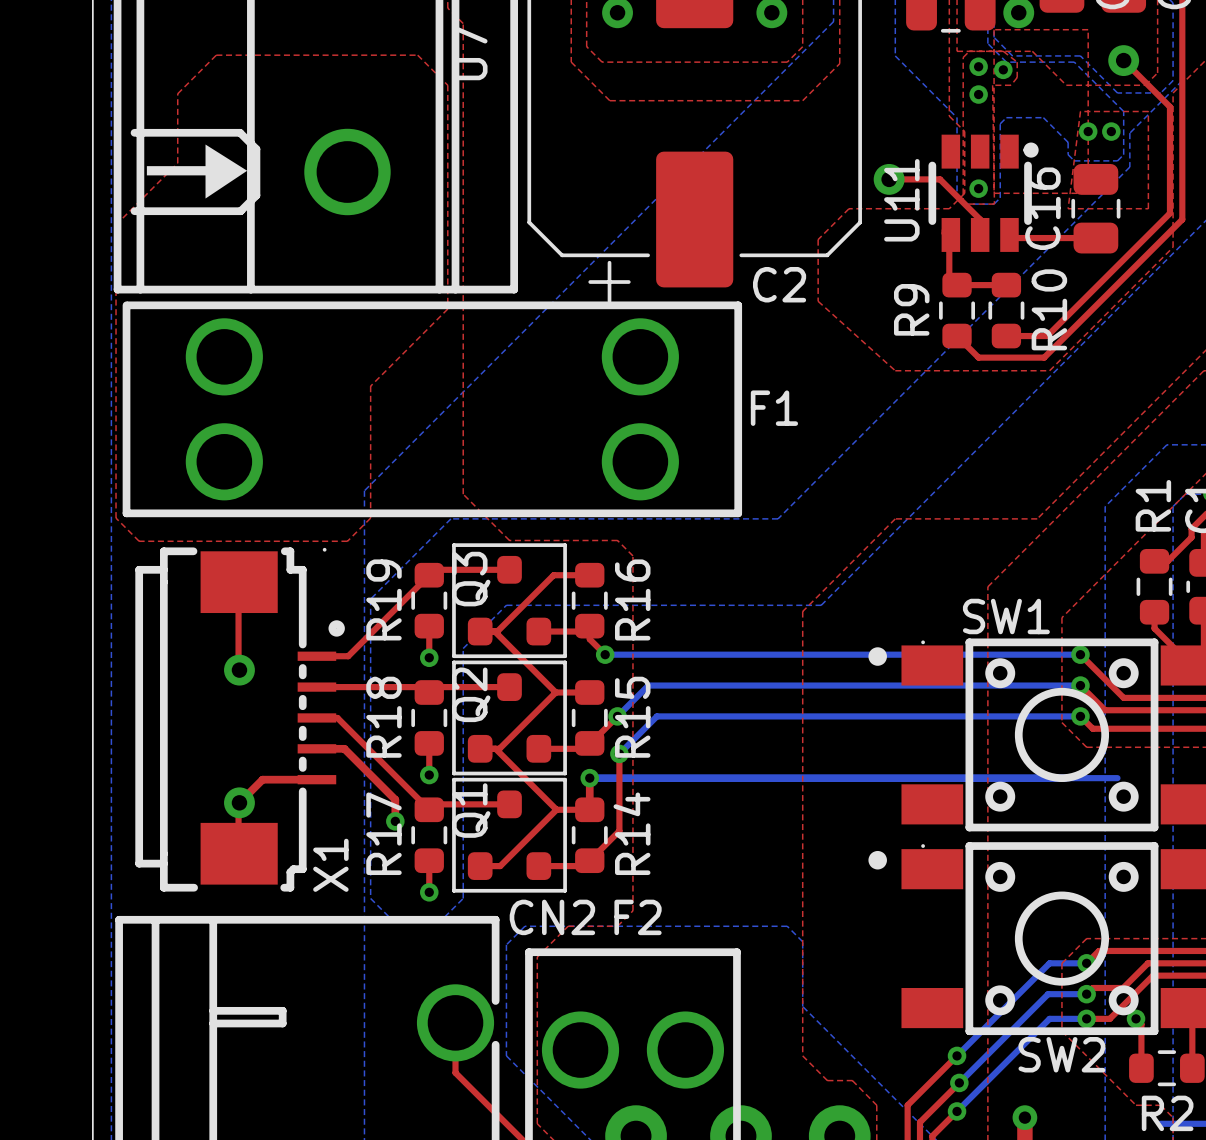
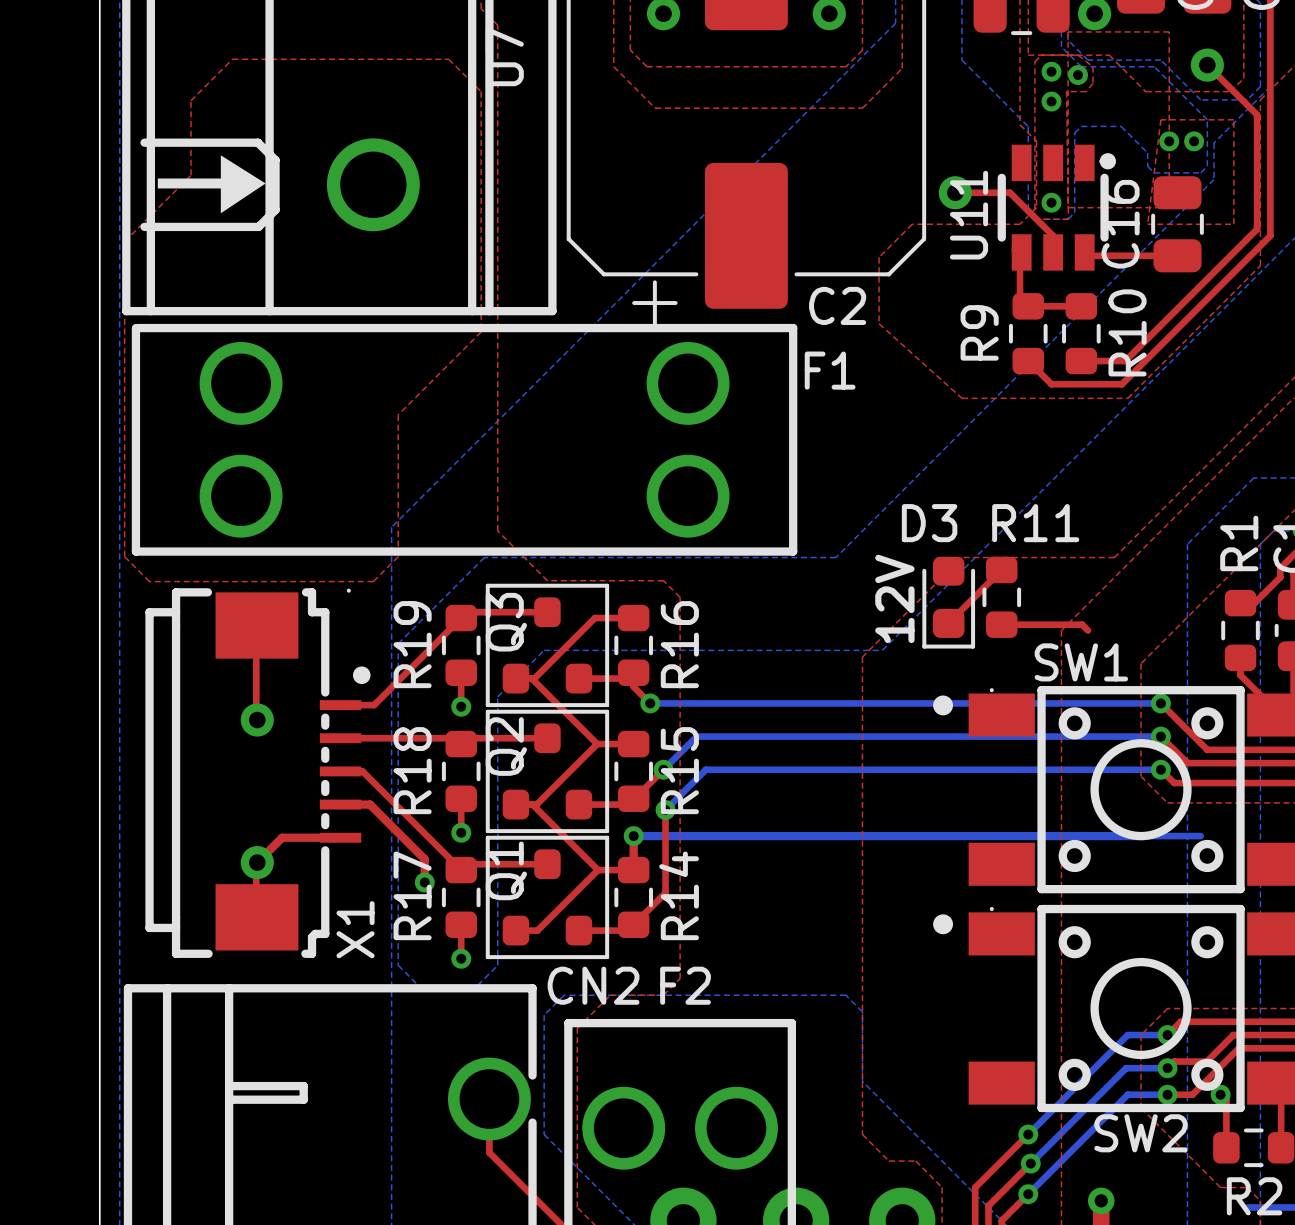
F1 name position: F1 (774, 408) -> F1 (830, 370)
top track: none -> (1001, 569) (948, 623)
R11: none -> (1001, 597)
text: none -> 12V (894, 598)
D3: none -> (948, 602)
top track: none -> (1001, 624) (1082, 624) (1087, 630)

